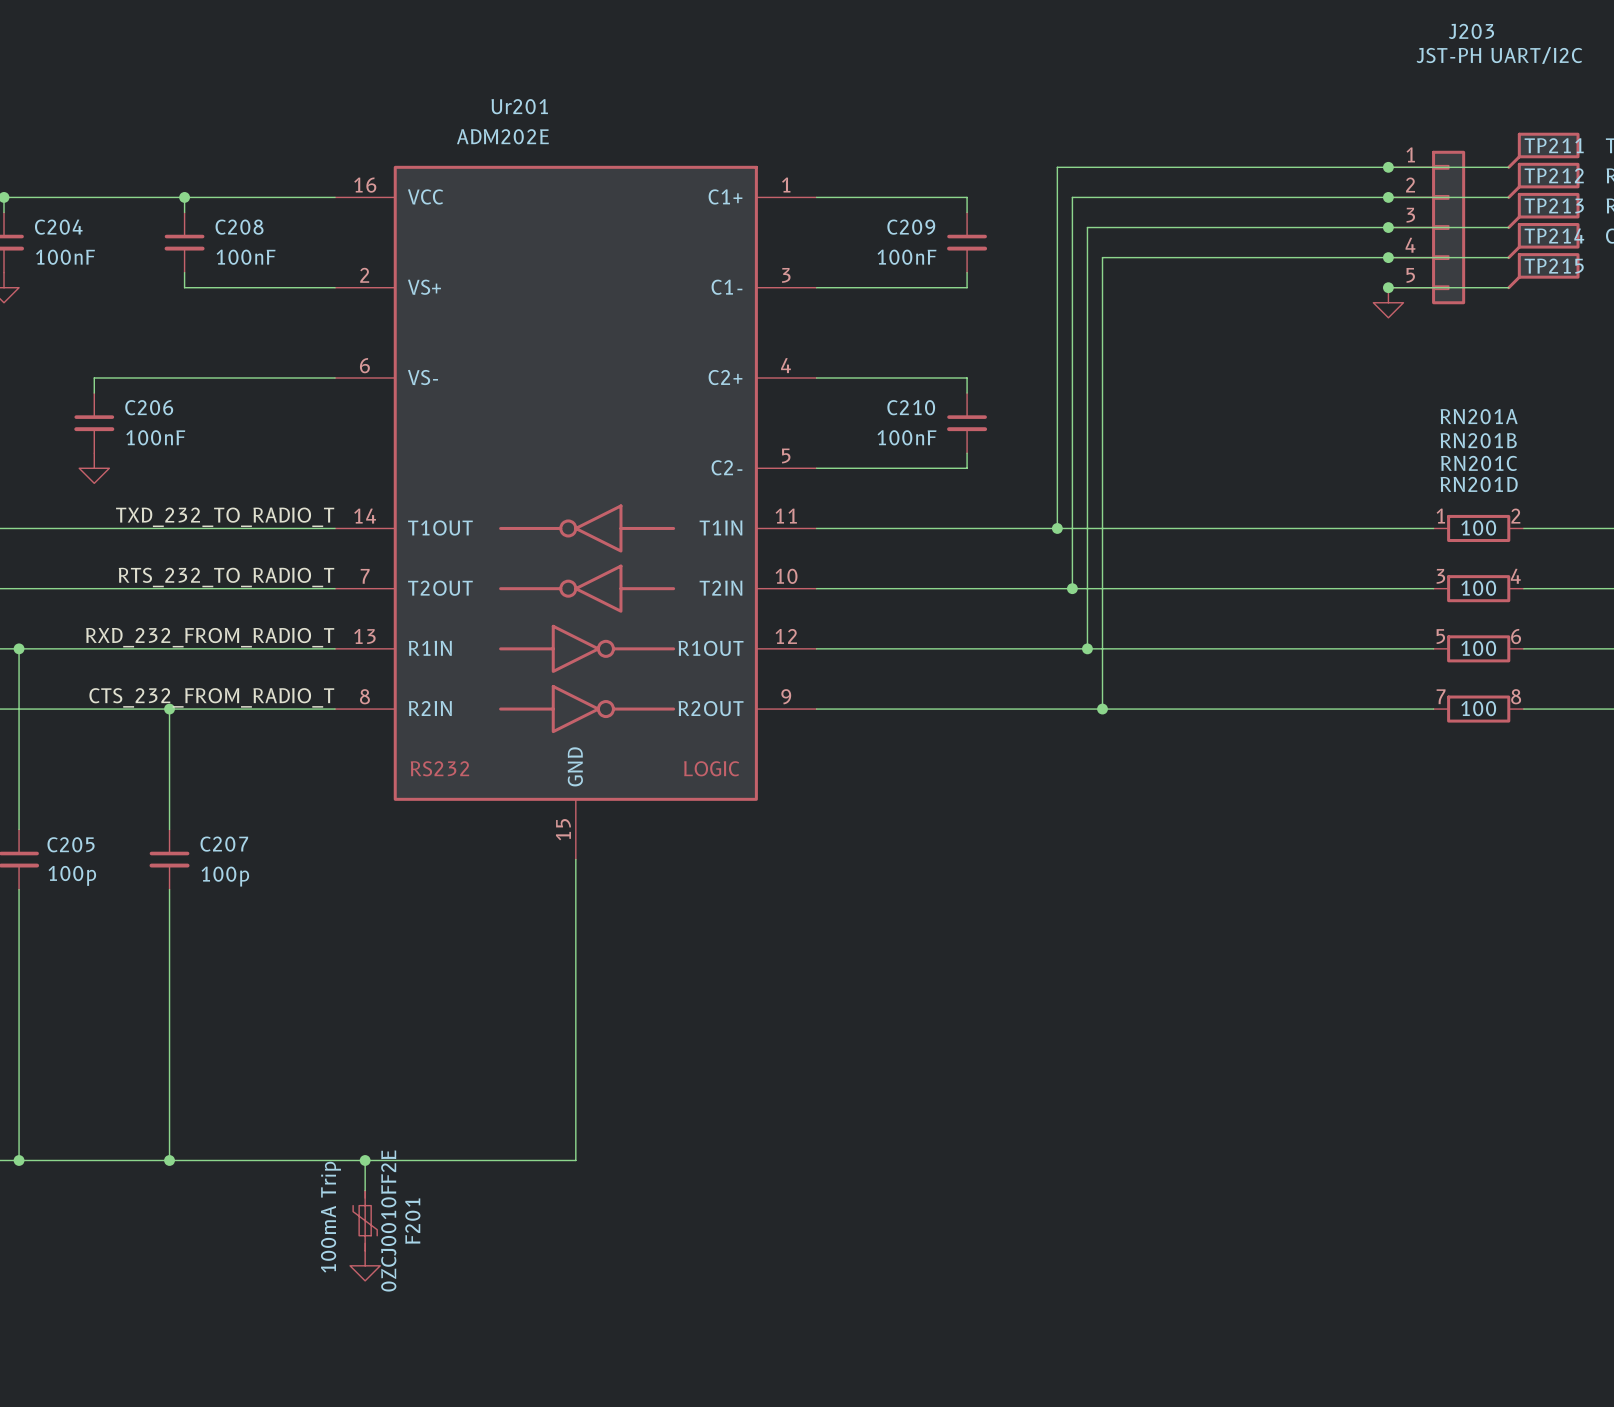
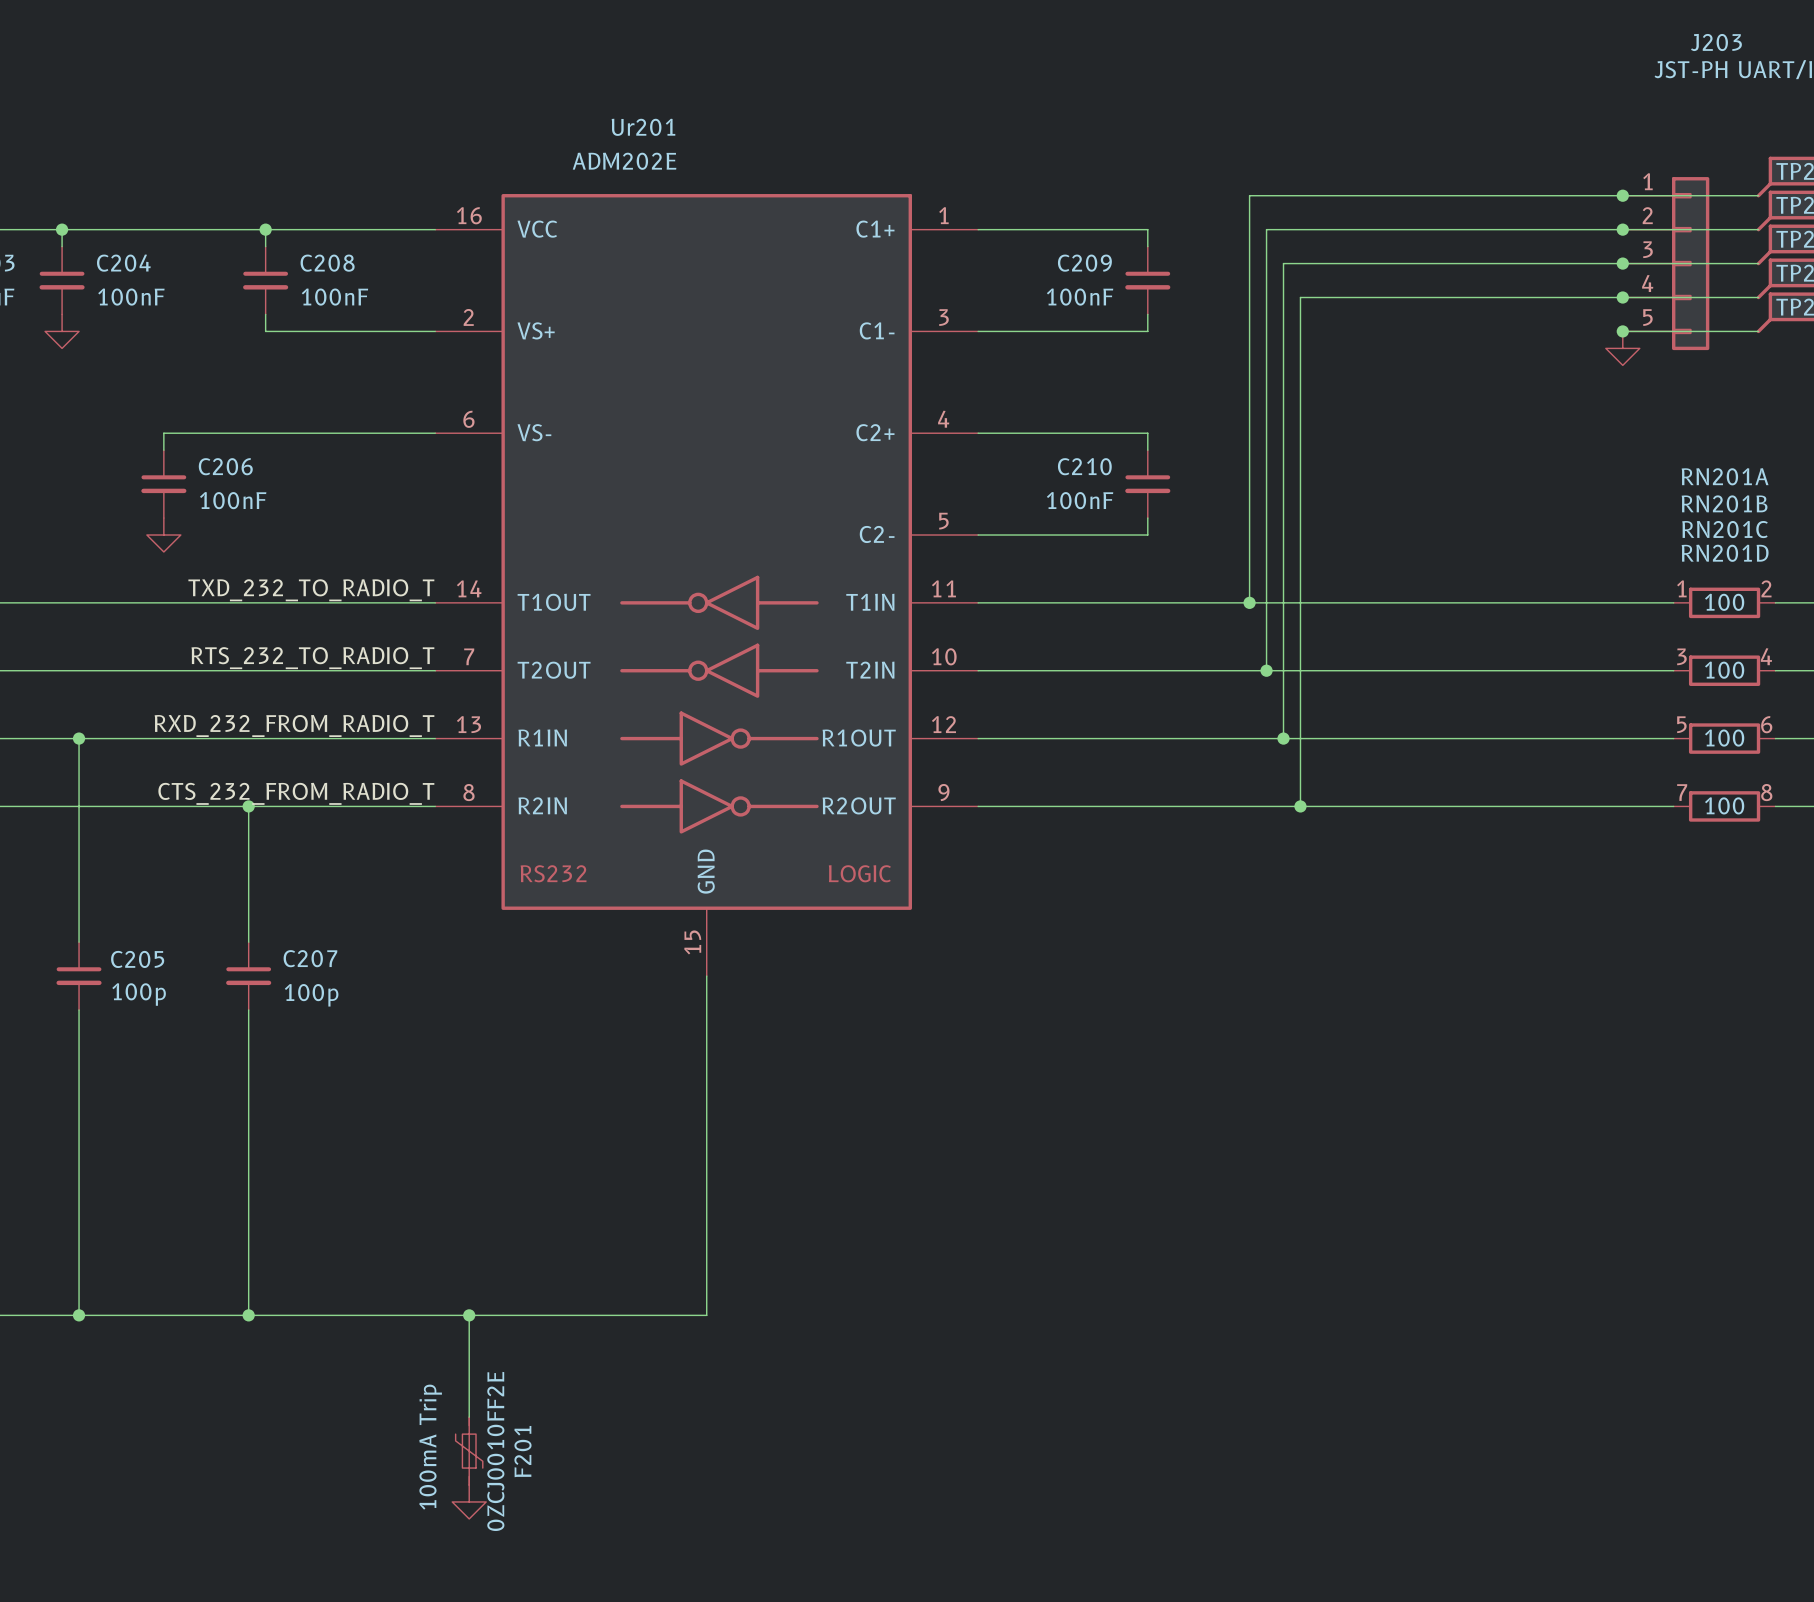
F201 position: (365, 1220) -> (469, 1451)
power symbol position: (365, 1265) -> (469, 1501)

